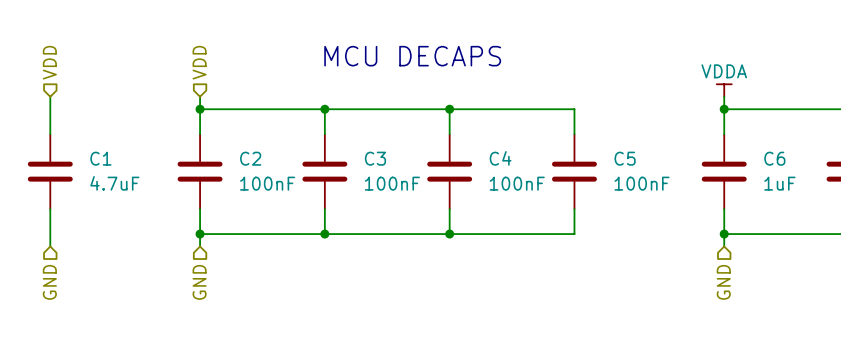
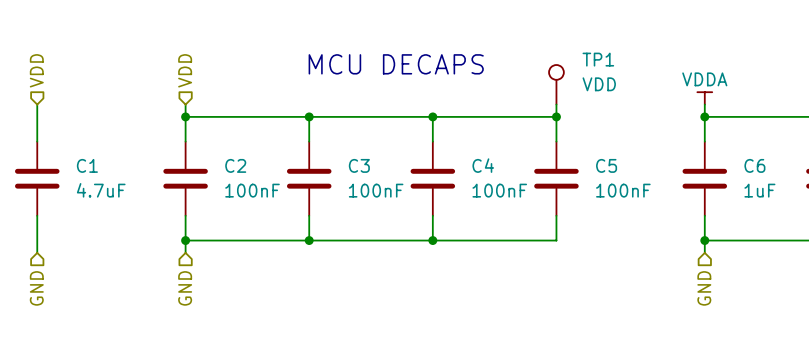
TP1: none -> VDD (556, 84)
wire: none -> (556, 104) (556, 116)
junction: none -> (556, 116)

